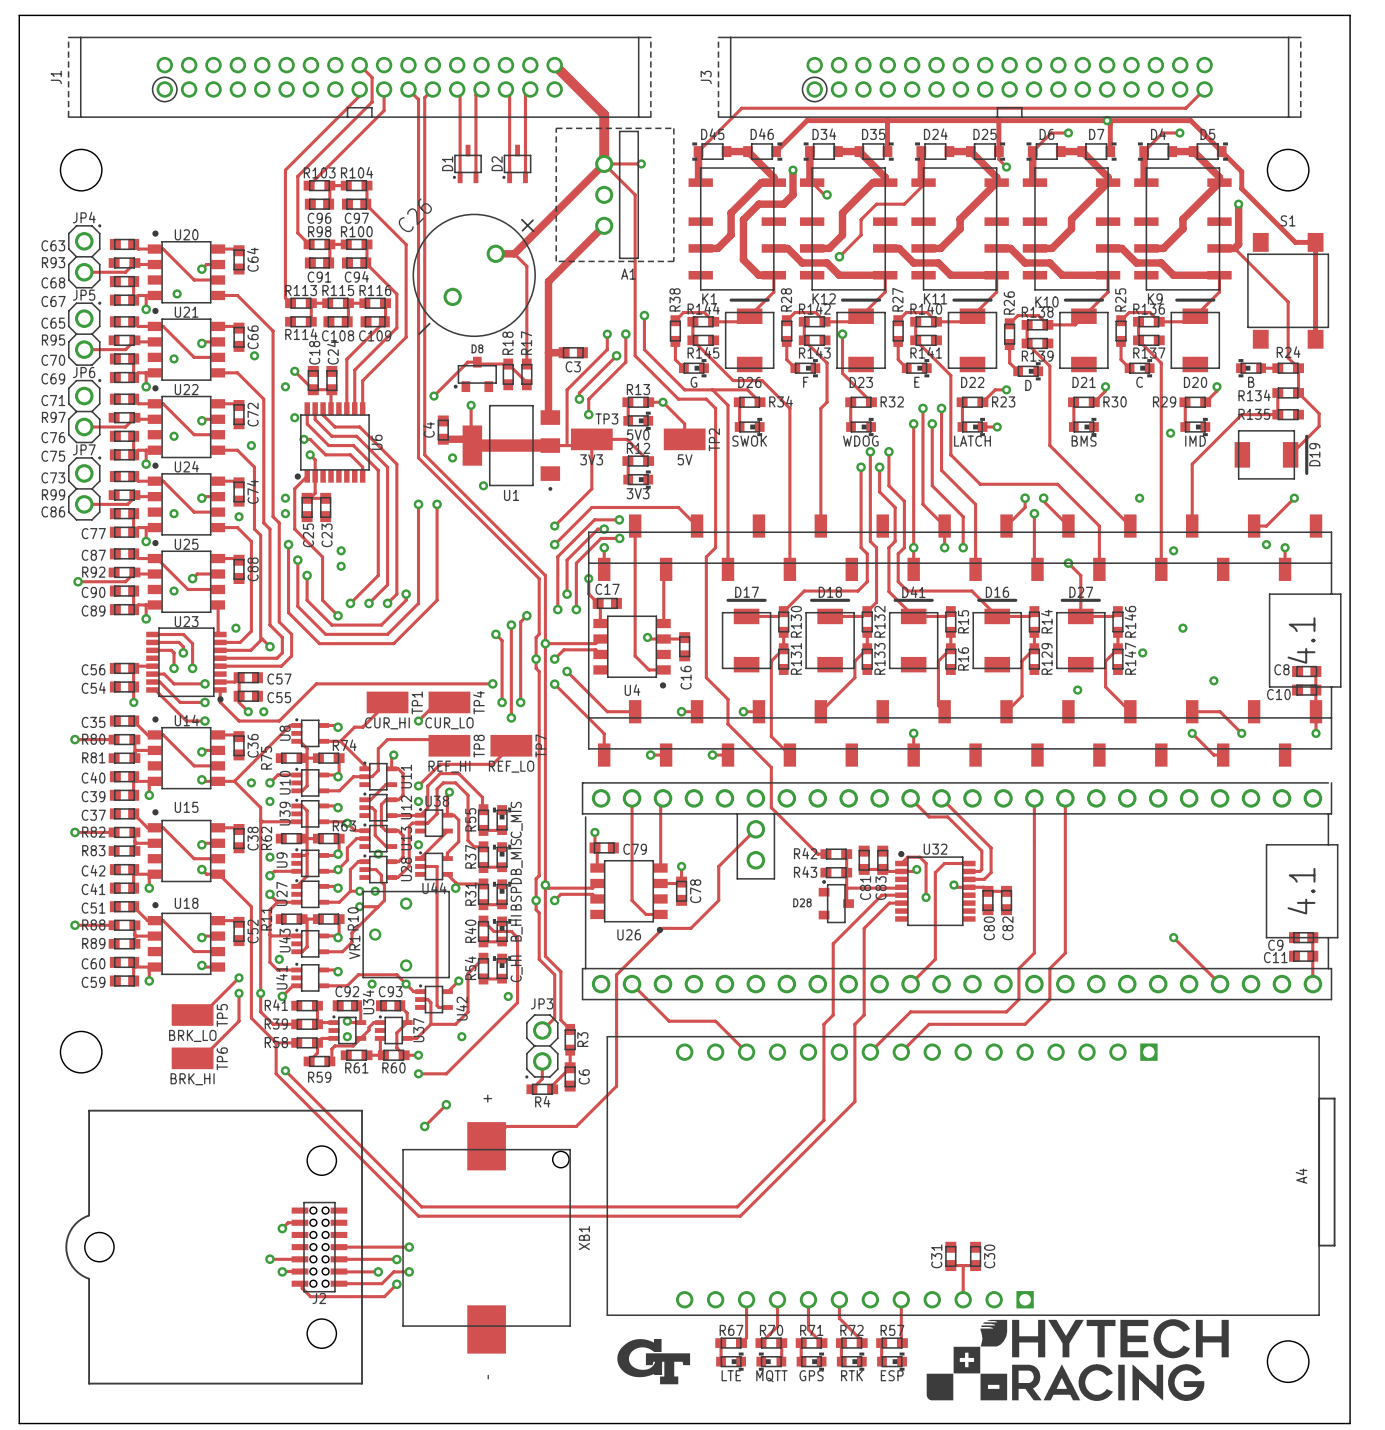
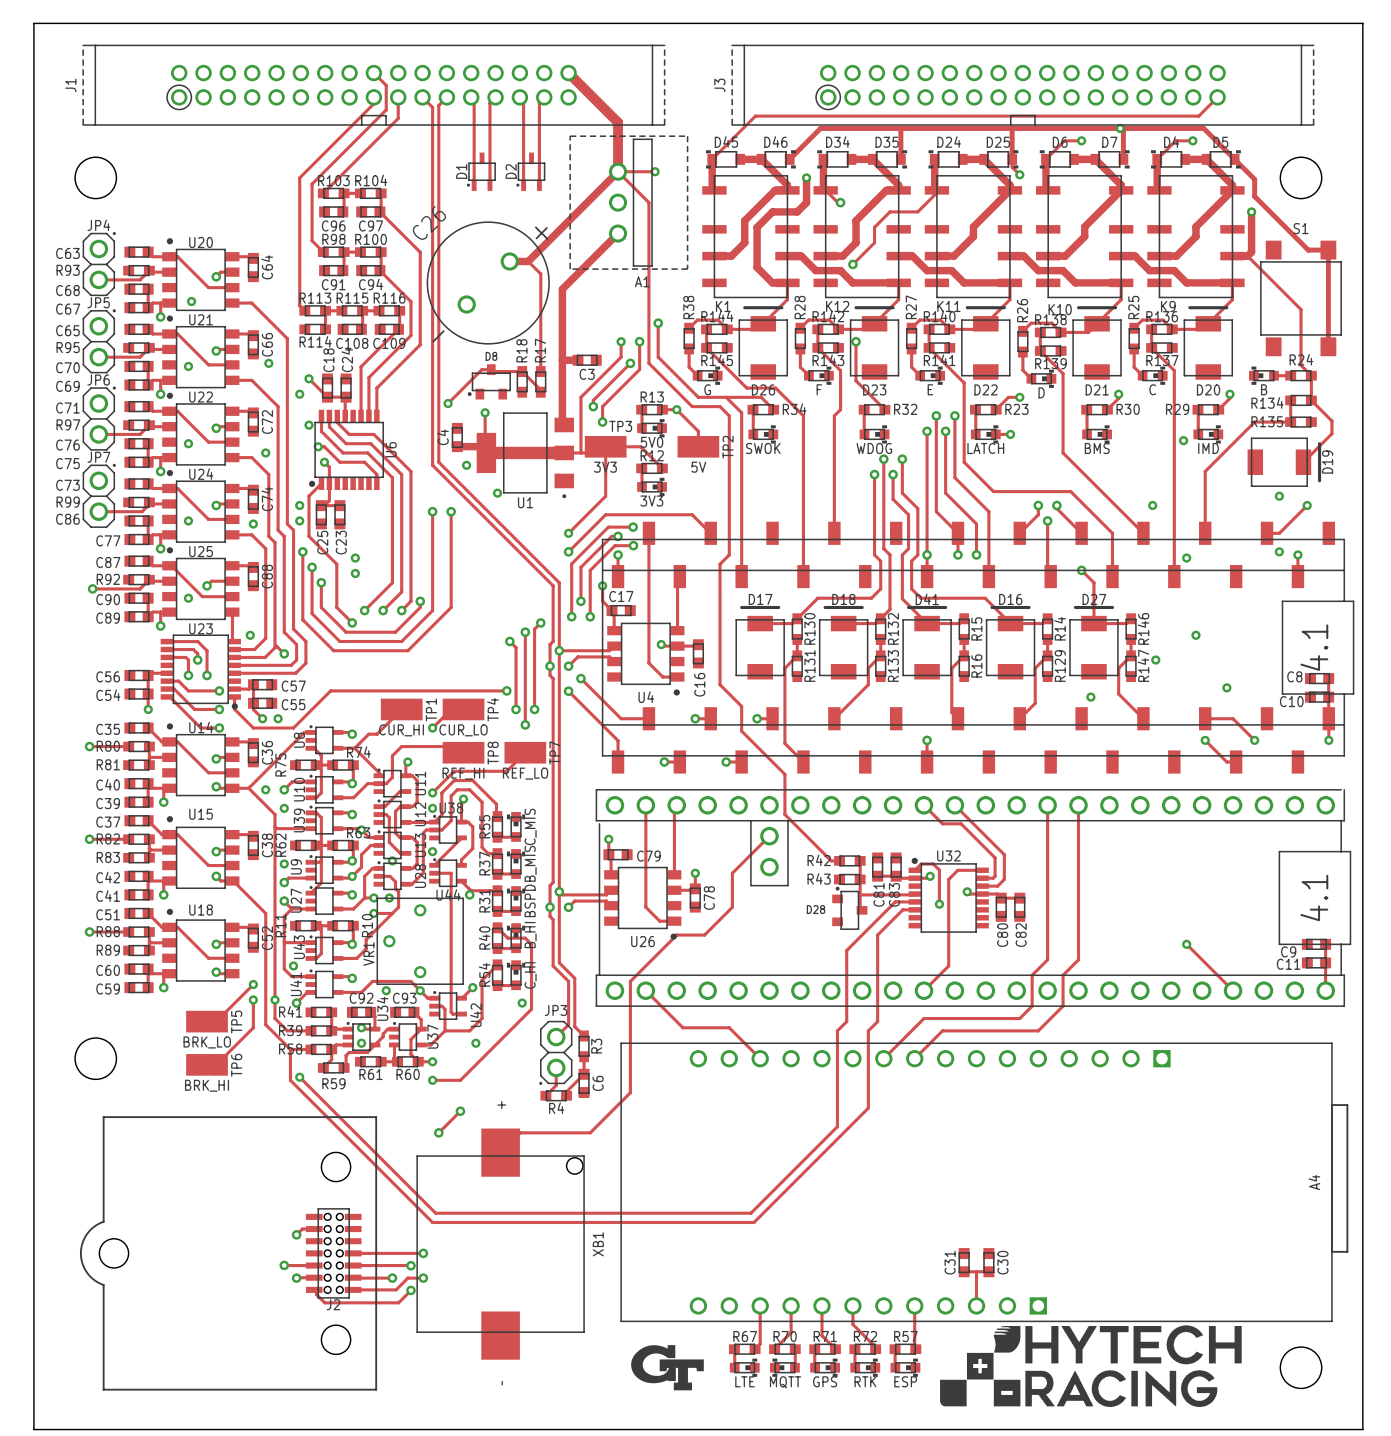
via: none -> (1279, 496)

